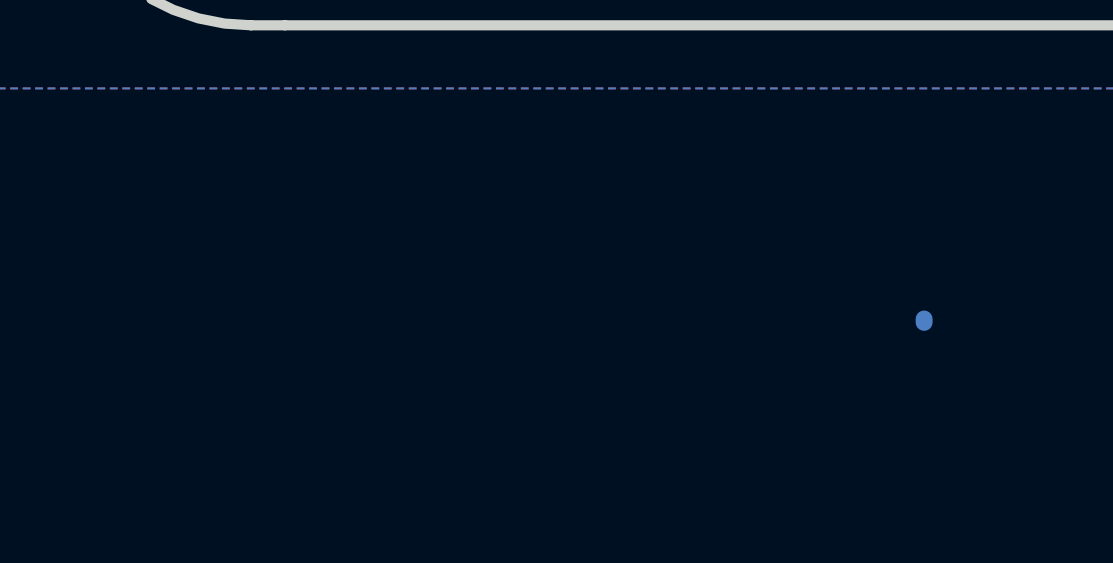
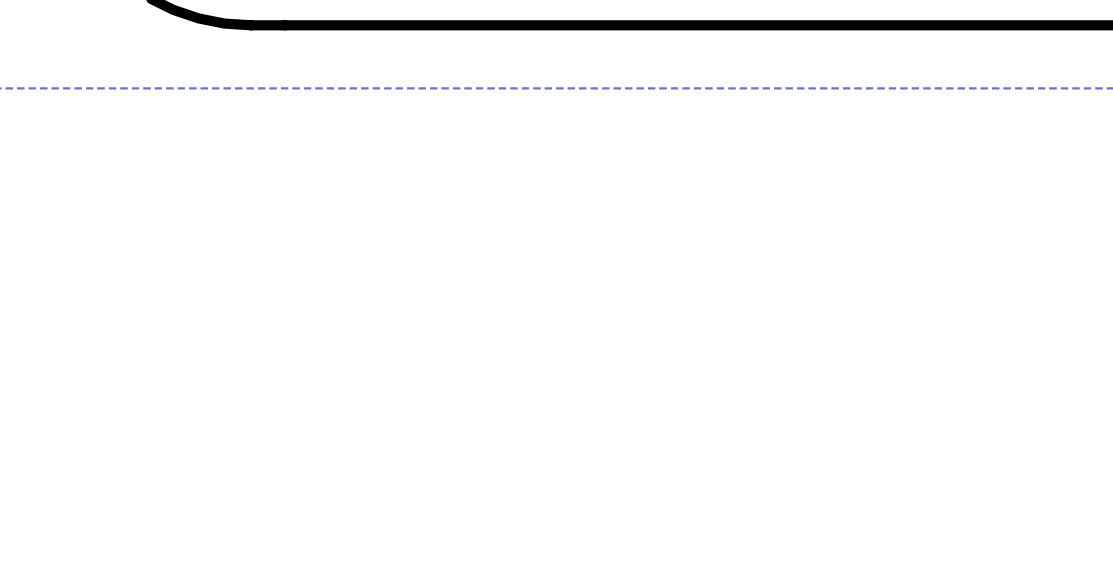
bottom track: (924, 318) (924, 322) -> none

